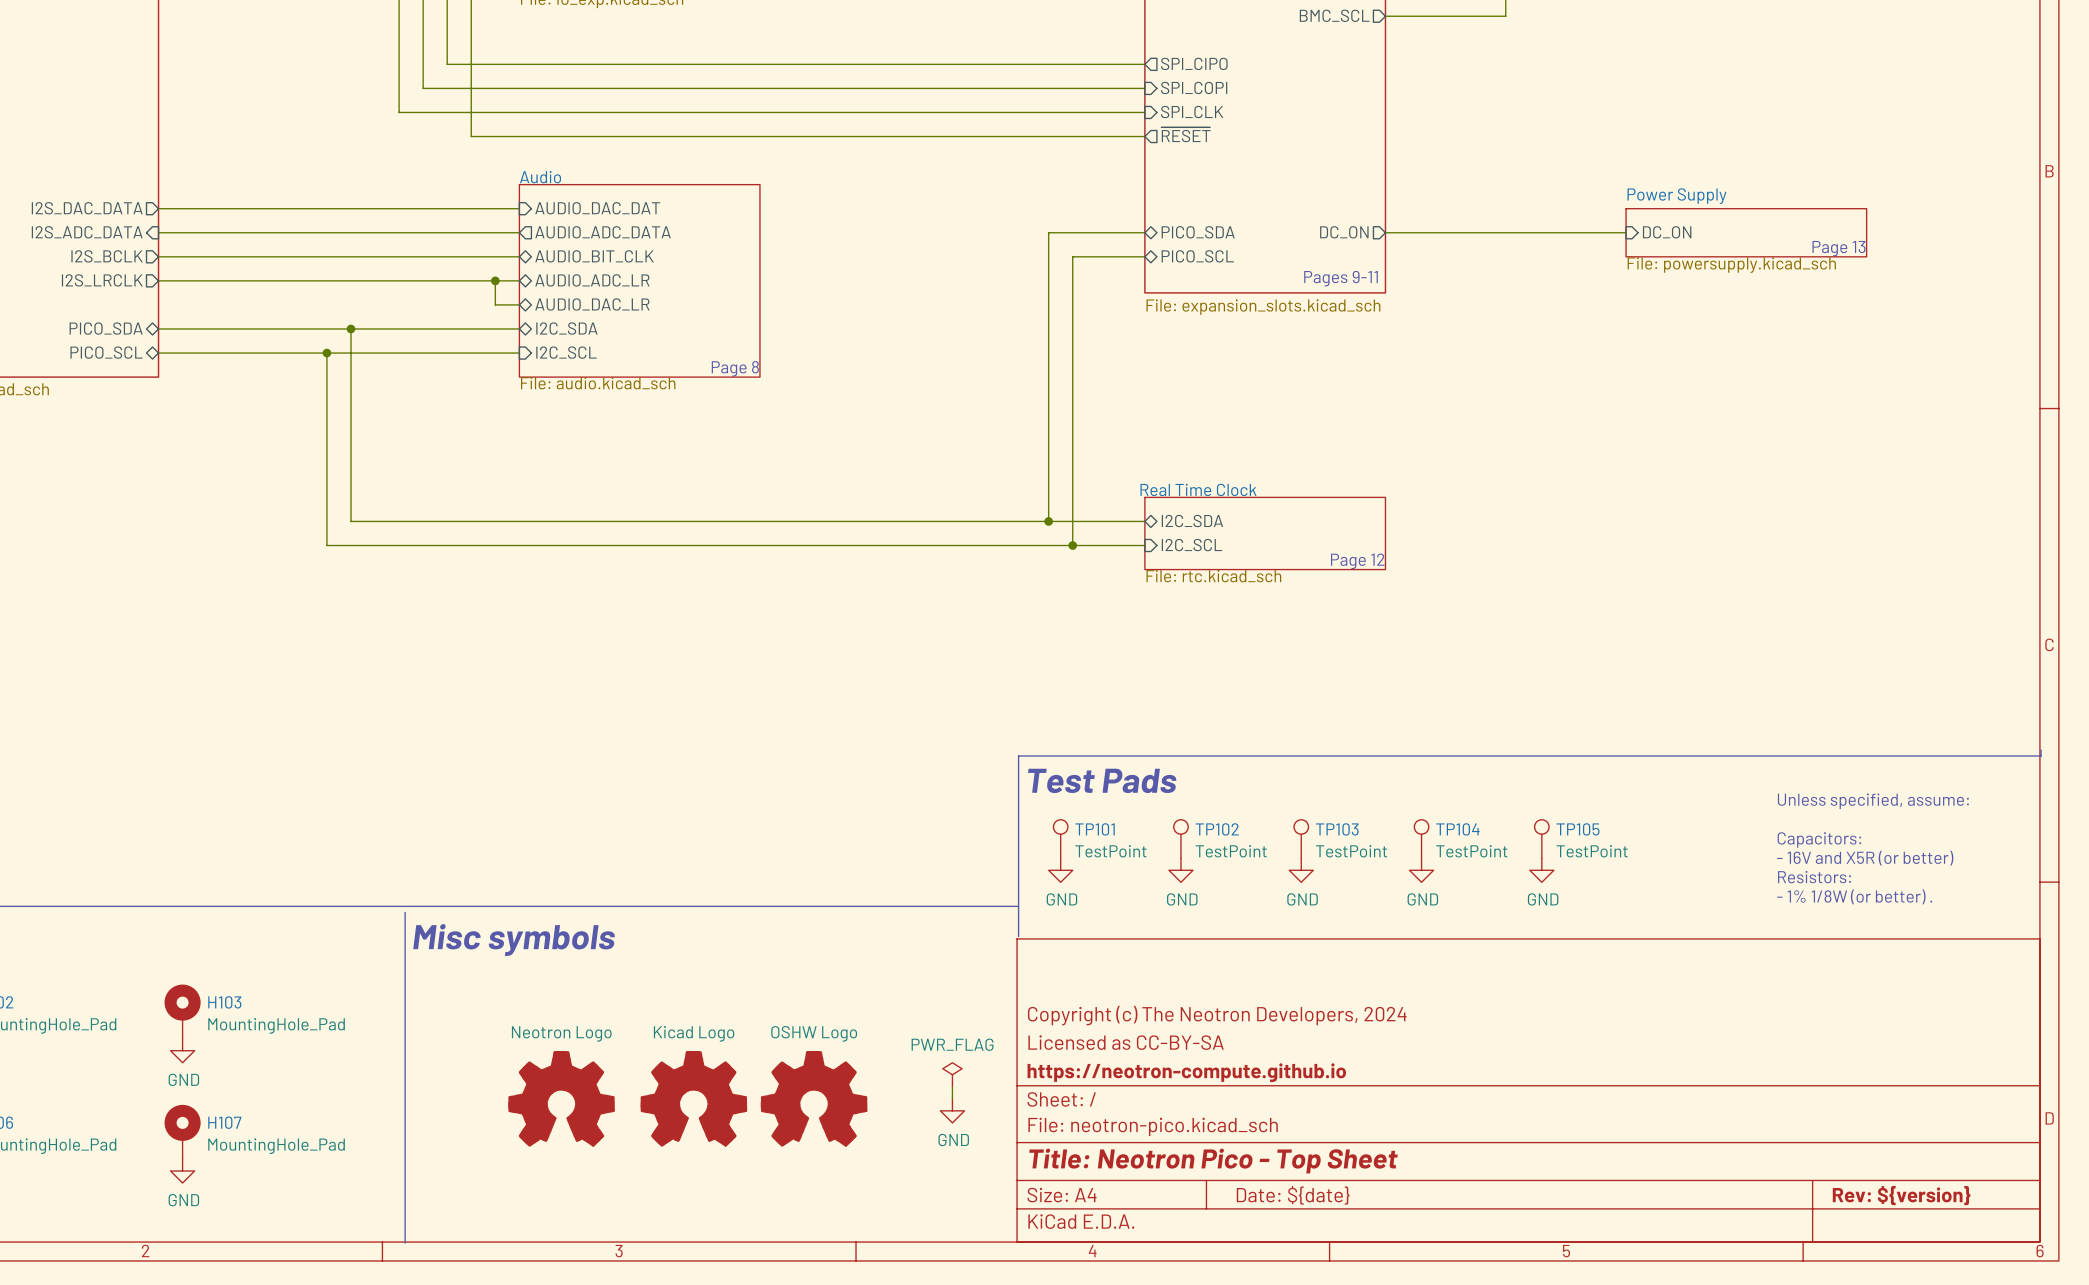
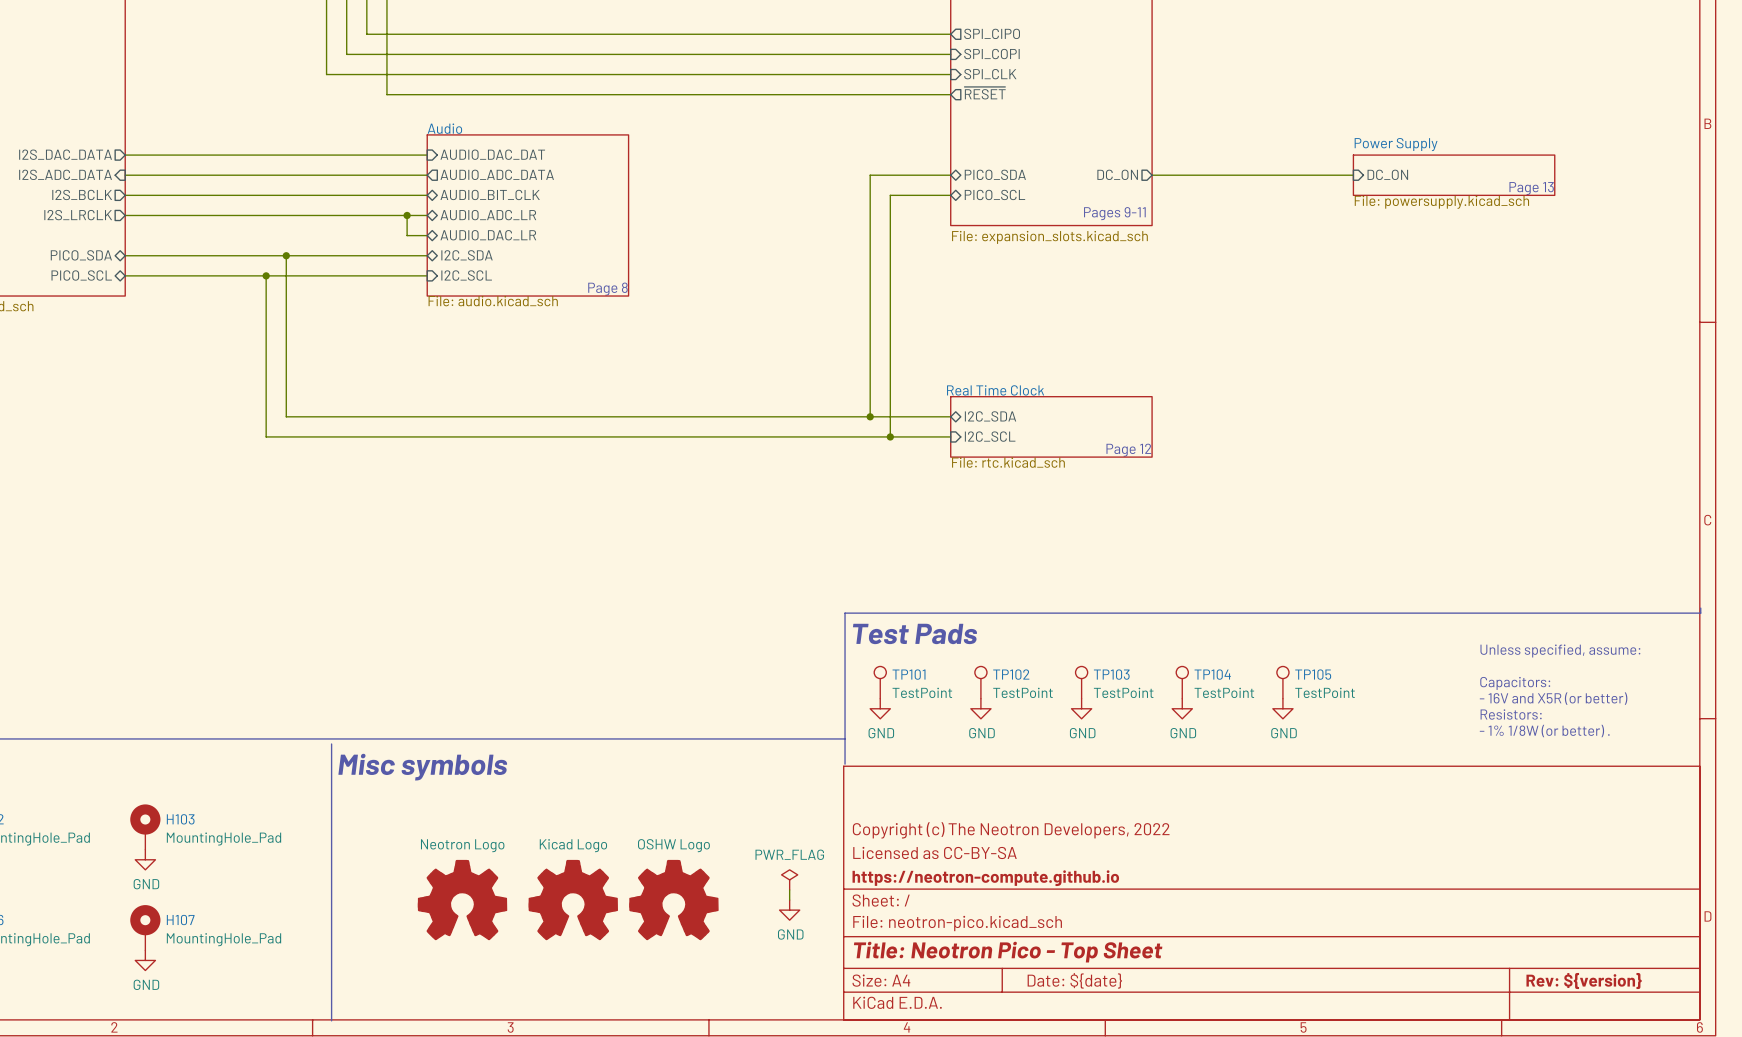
title block: Copyright (c) The Neotron Developers, 2024 (1217, 1015) -> Copyright (c) The Neotron Developers, 2022 (1011, 830)

